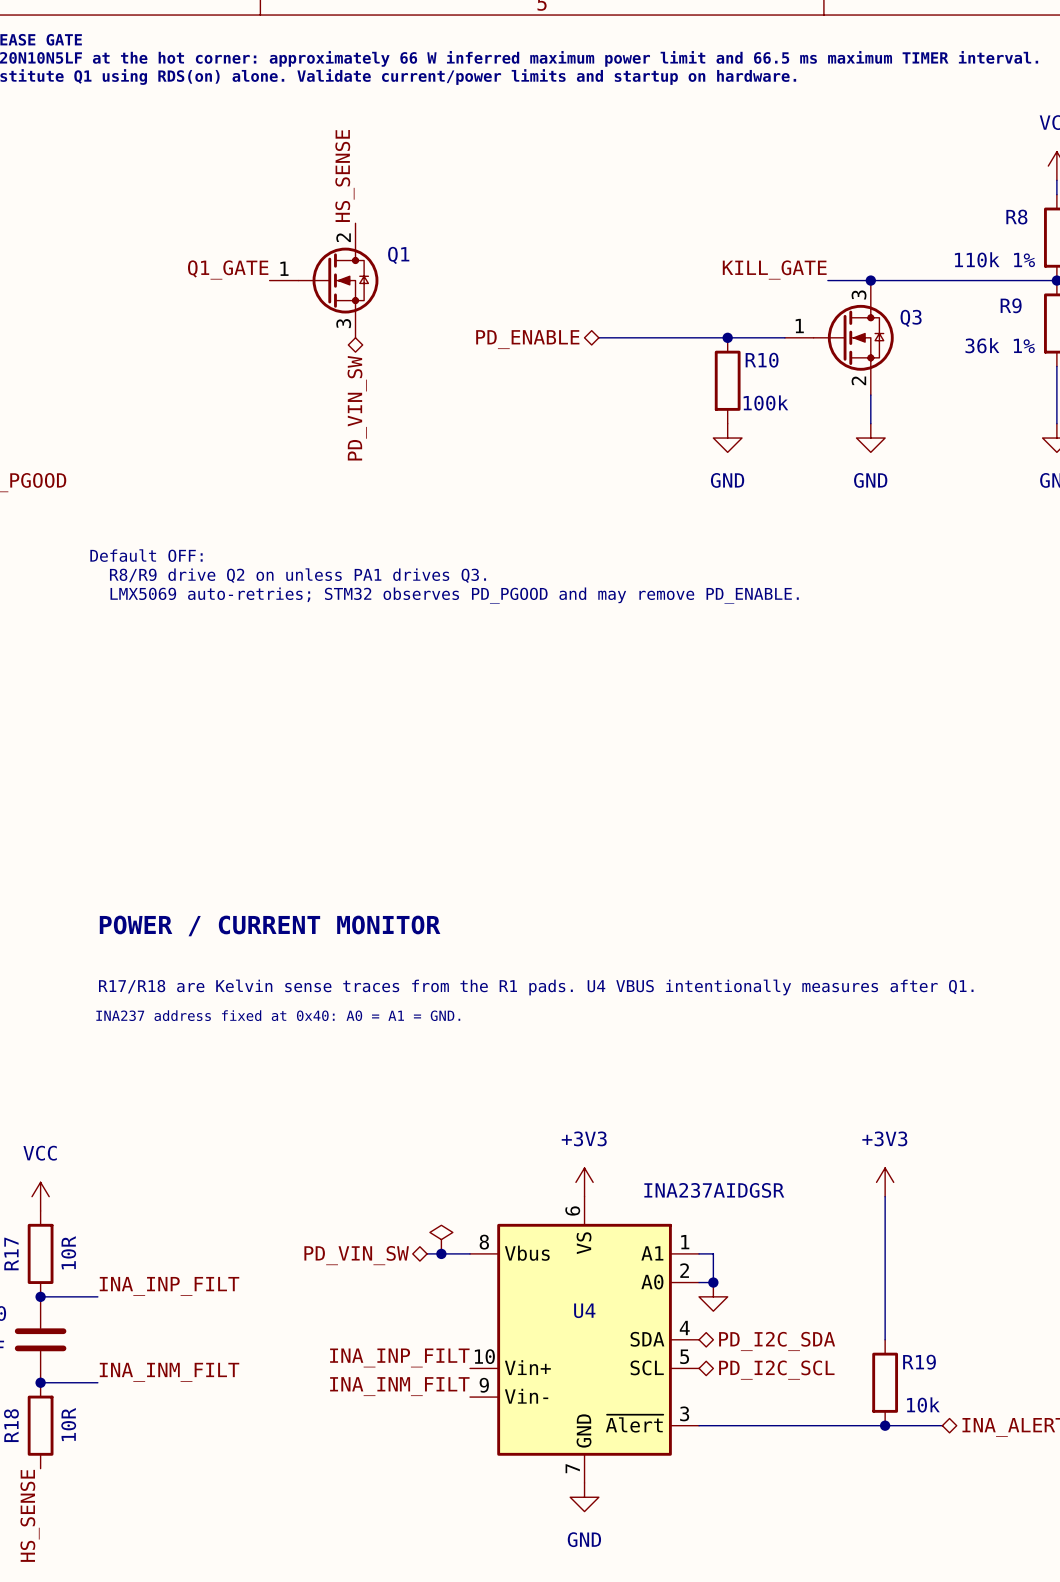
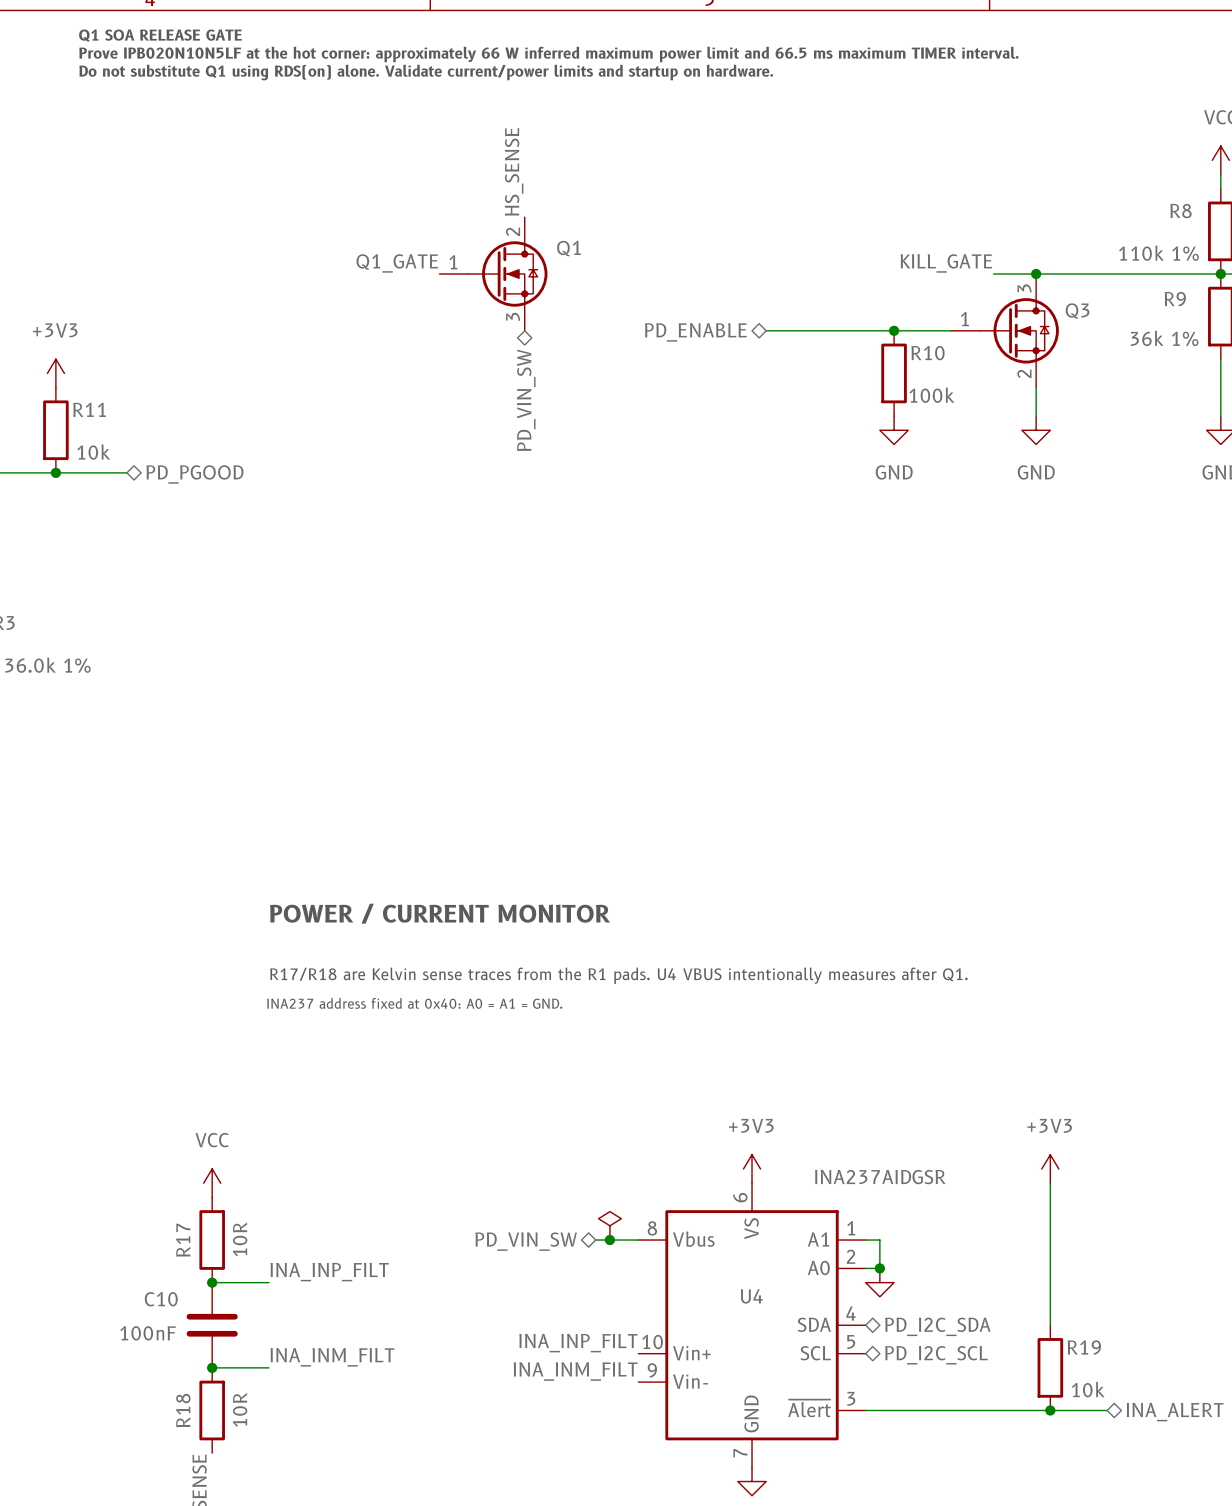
text: Default OFF: (146, 555) -> none
text: R8/R9 drive Q2 on unless PA1 drives Q3. (298, 575) -> none
text: LMX5069 auto-retries; STM32 observes PD_PGOOD and may remove PD_ENABLE. (454, 595) -> none

